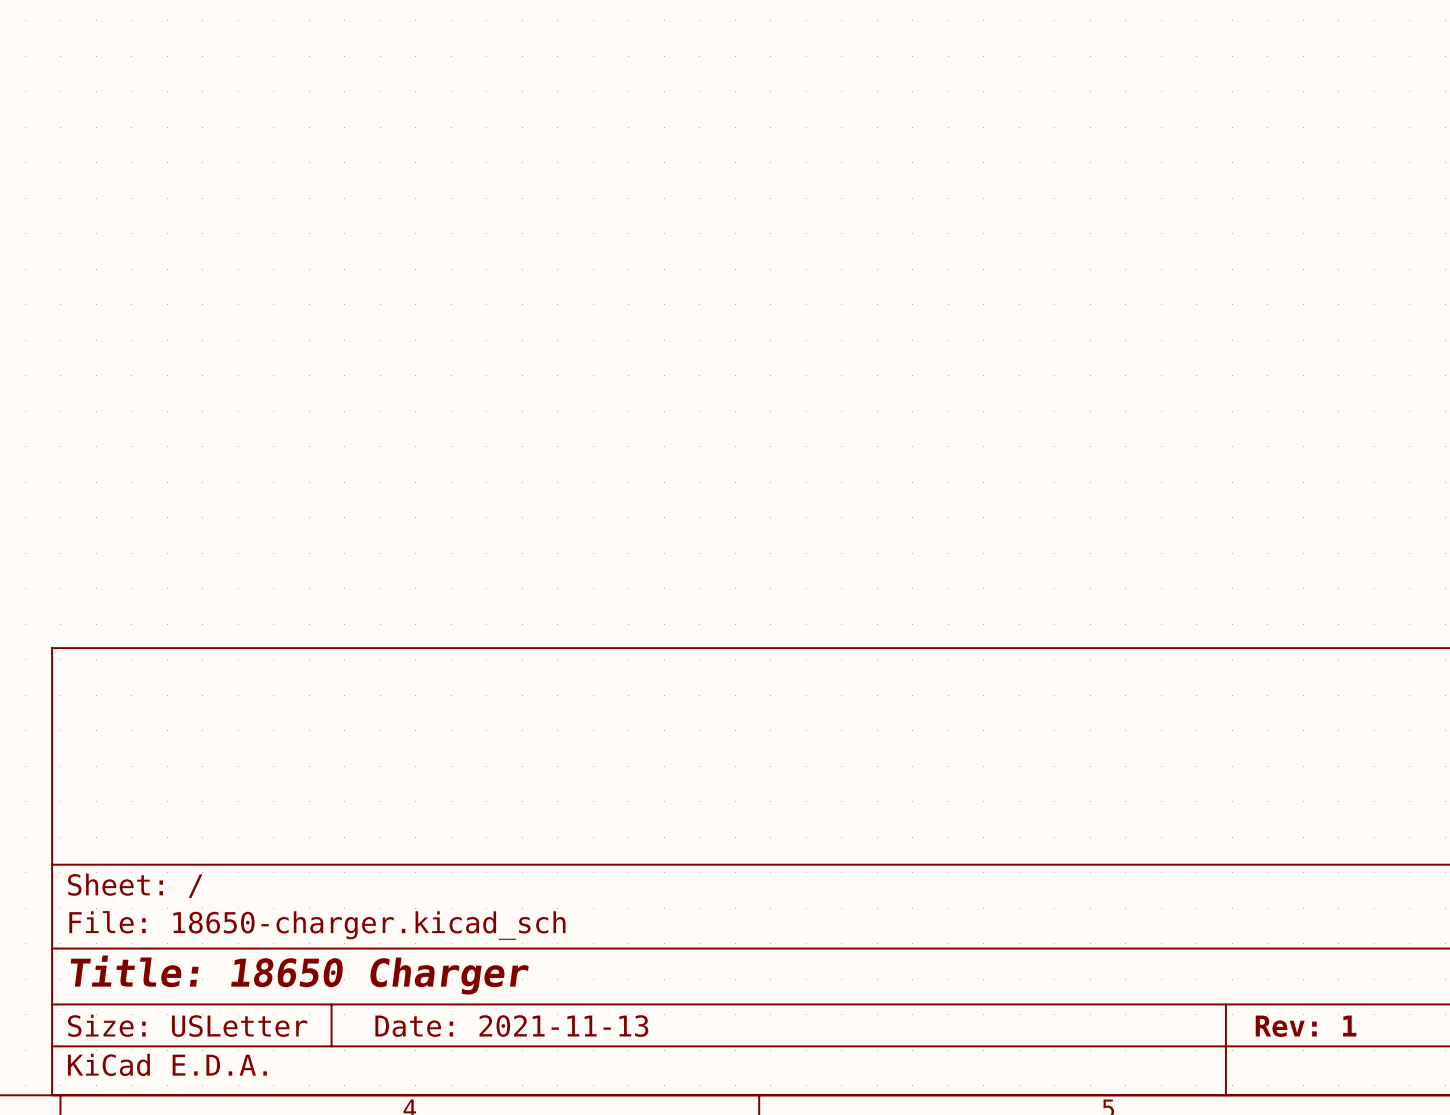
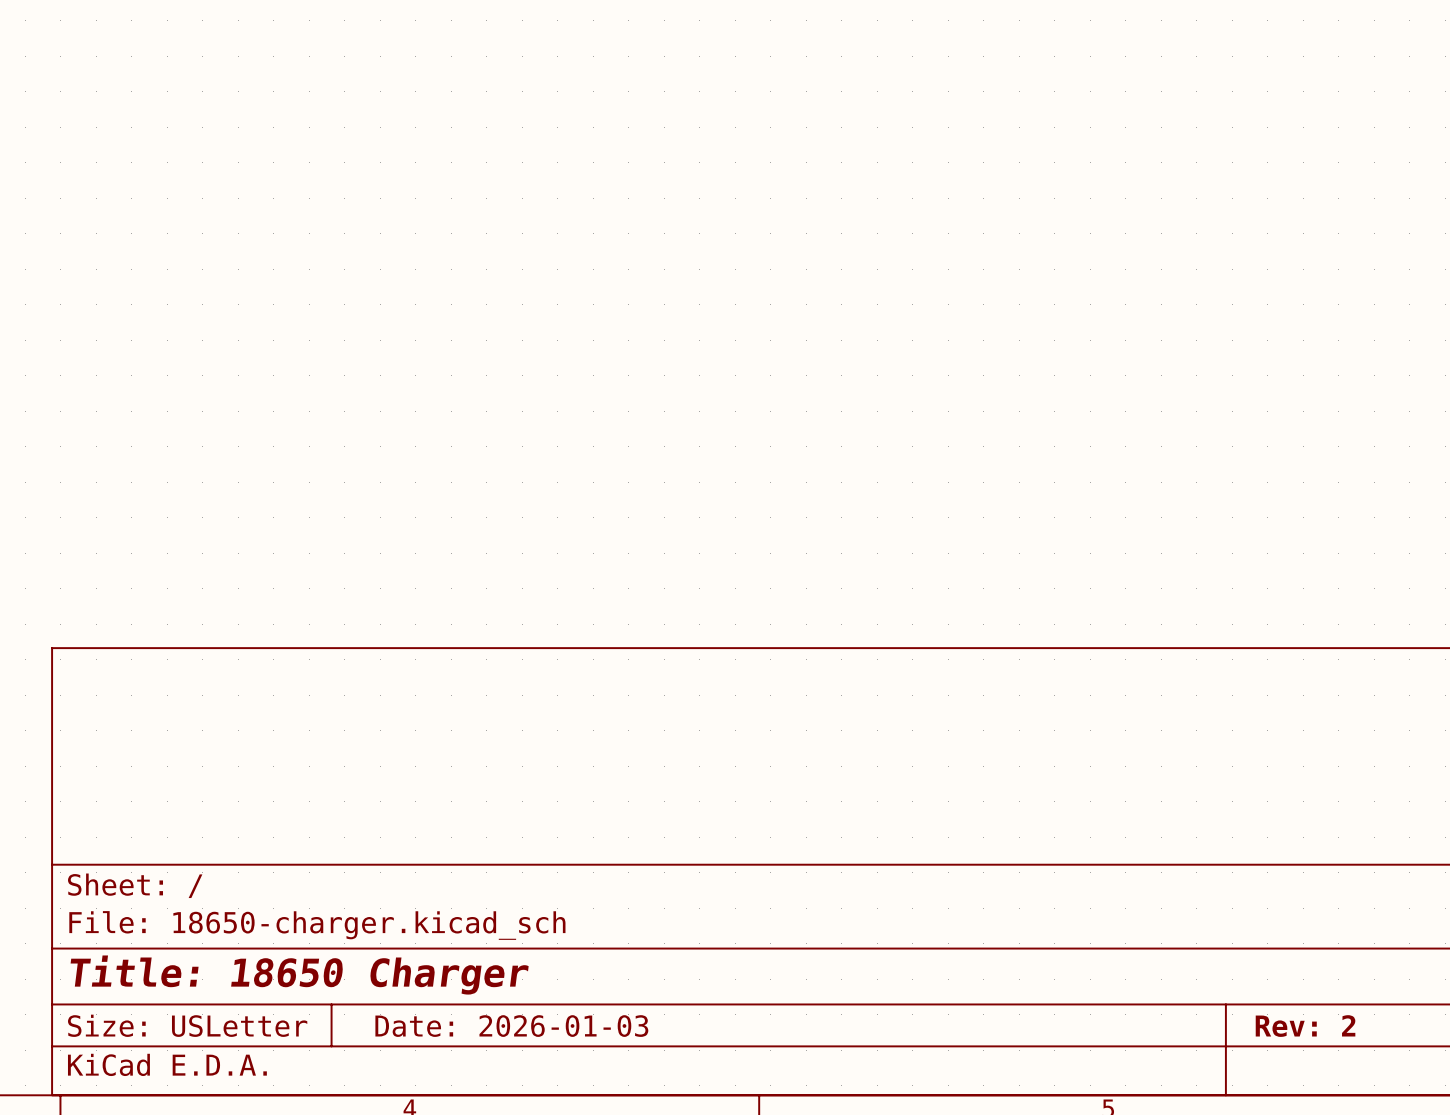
title block: Date: 2021-11-13 (511, 1026) -> Date: 2026-01-03 (511, 1026)
title block: Rev: 1 (1306, 1026) -> Rev: 2 (1305, 1026)

